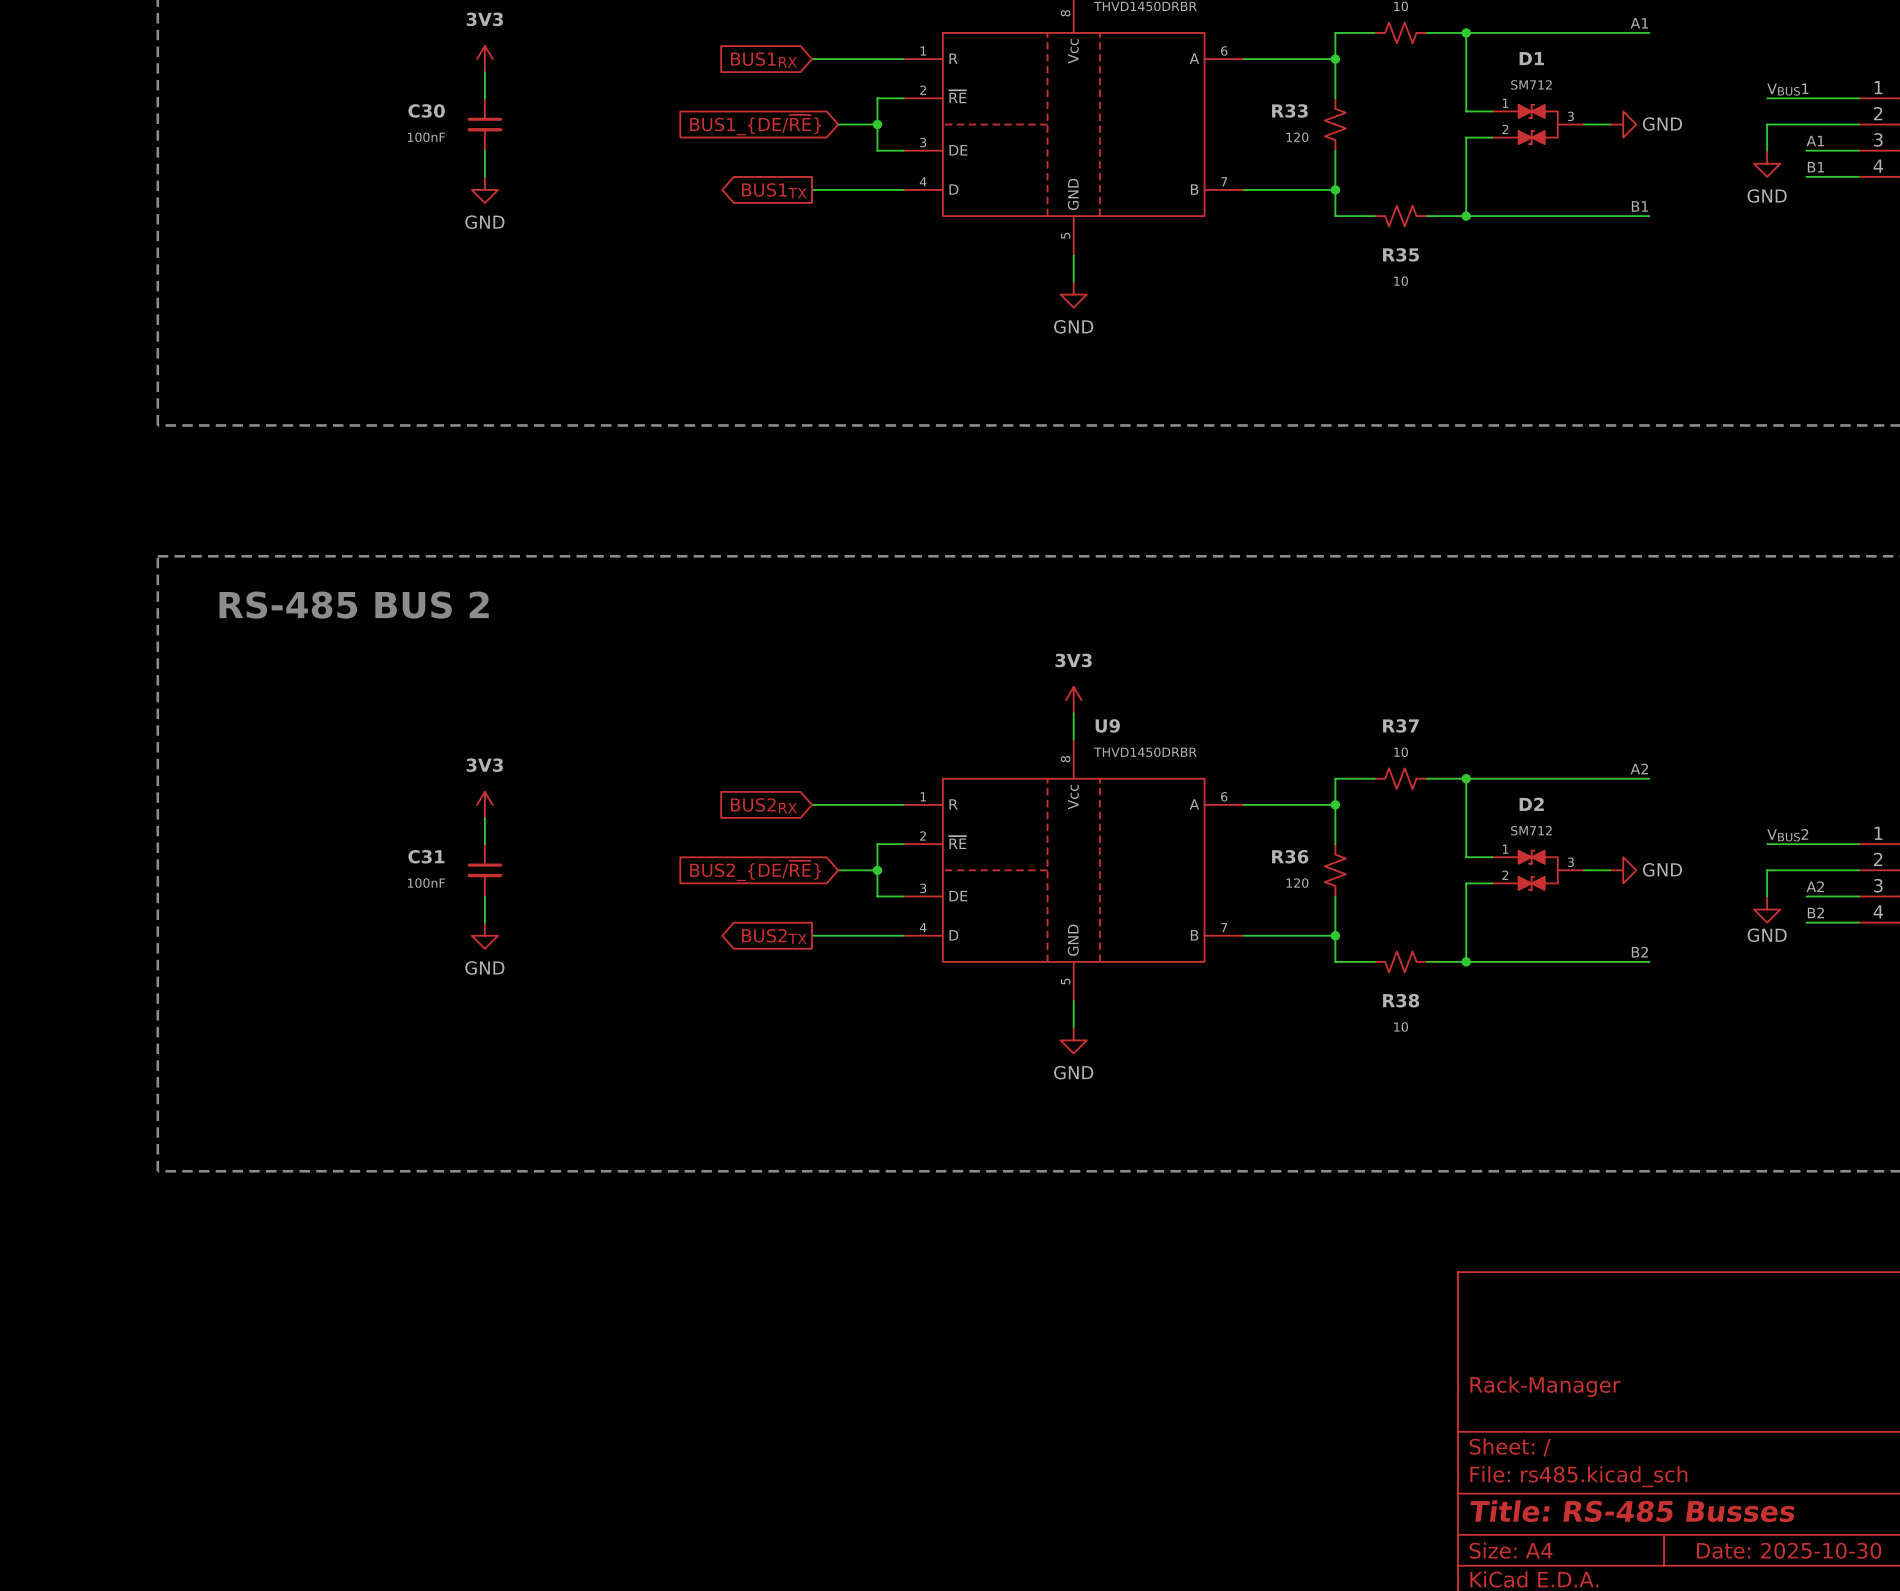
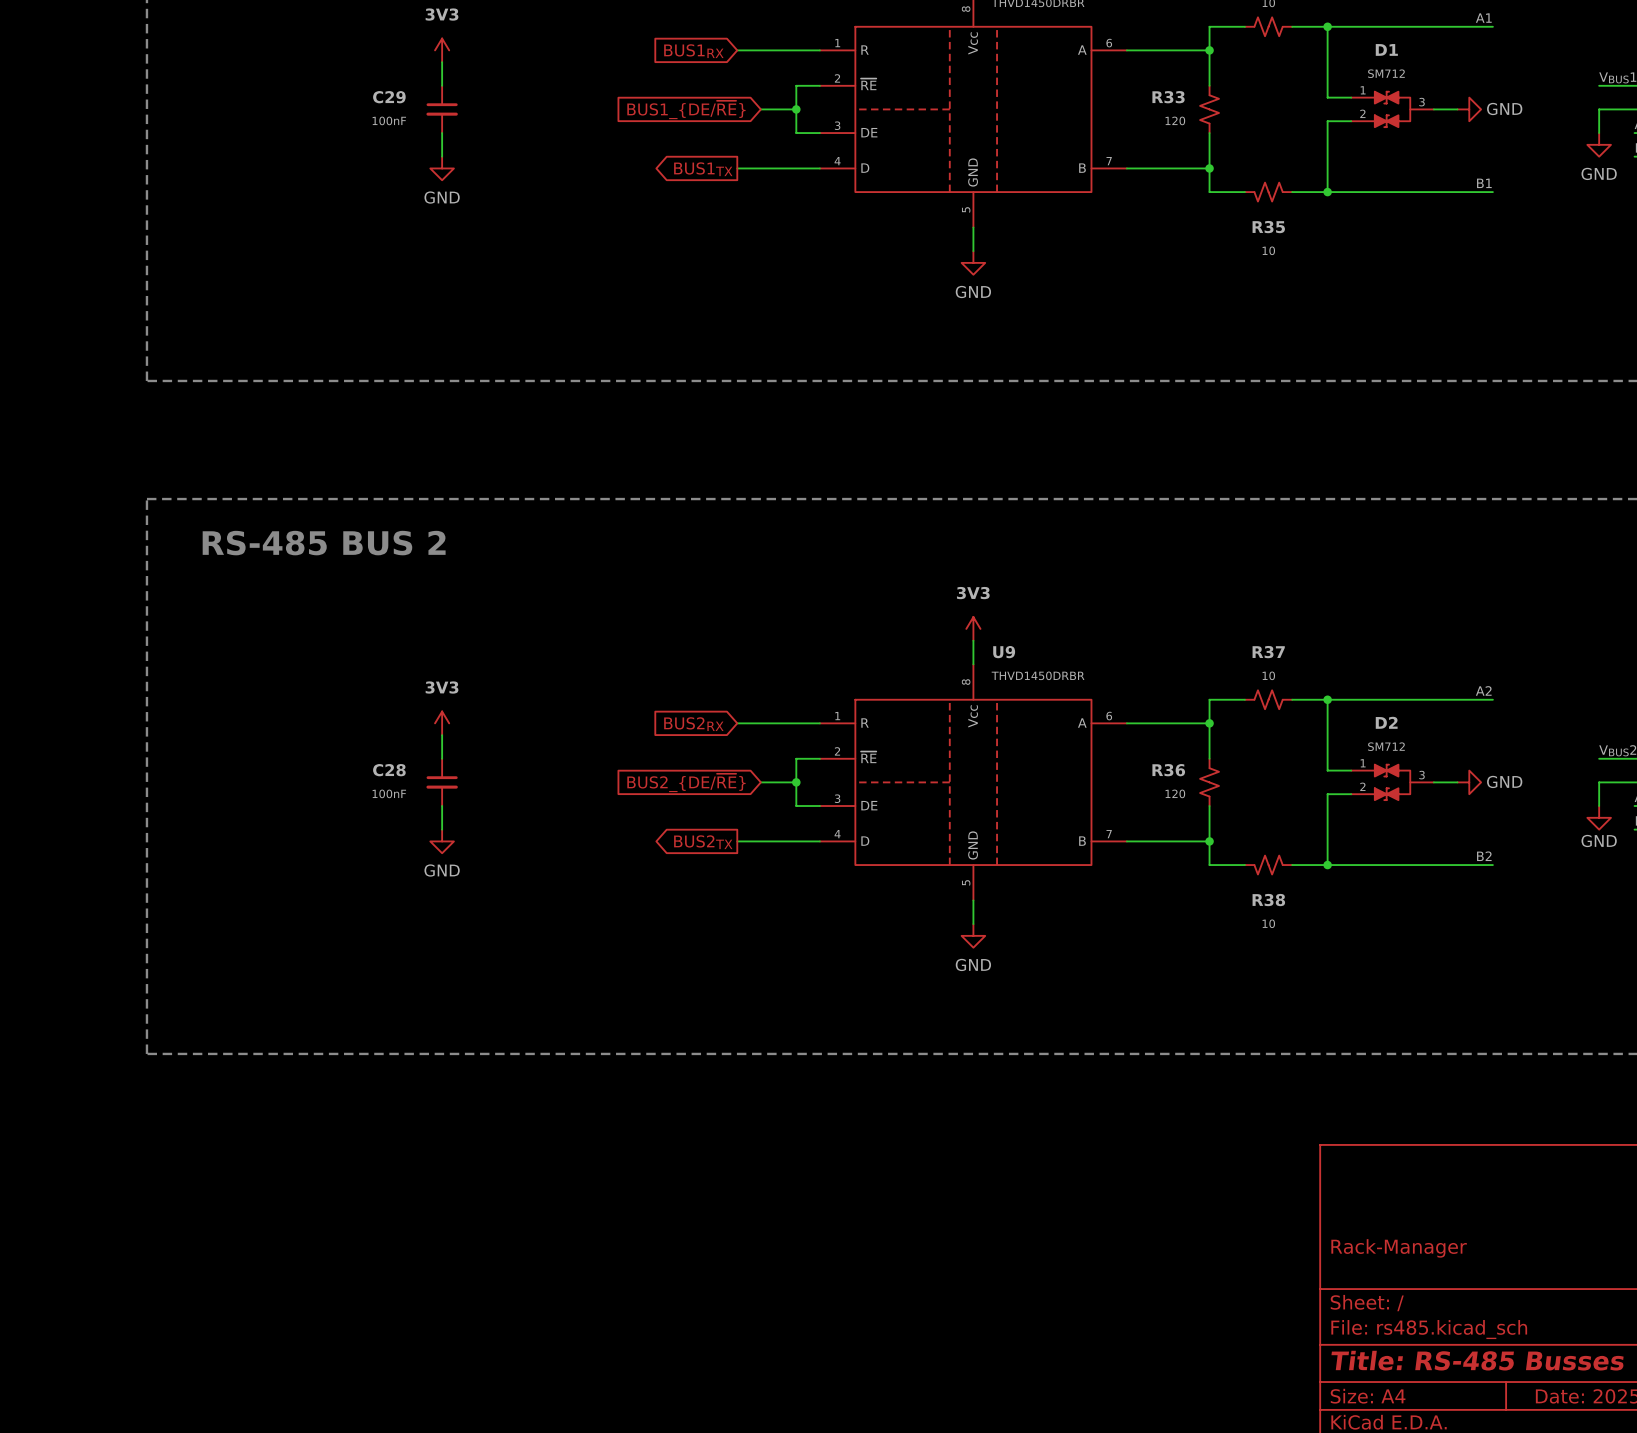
C30 name: C30 (426, 110) -> C29 (389, 97)
C31 name: C31 (426, 856) -> C28 (389, 770)

